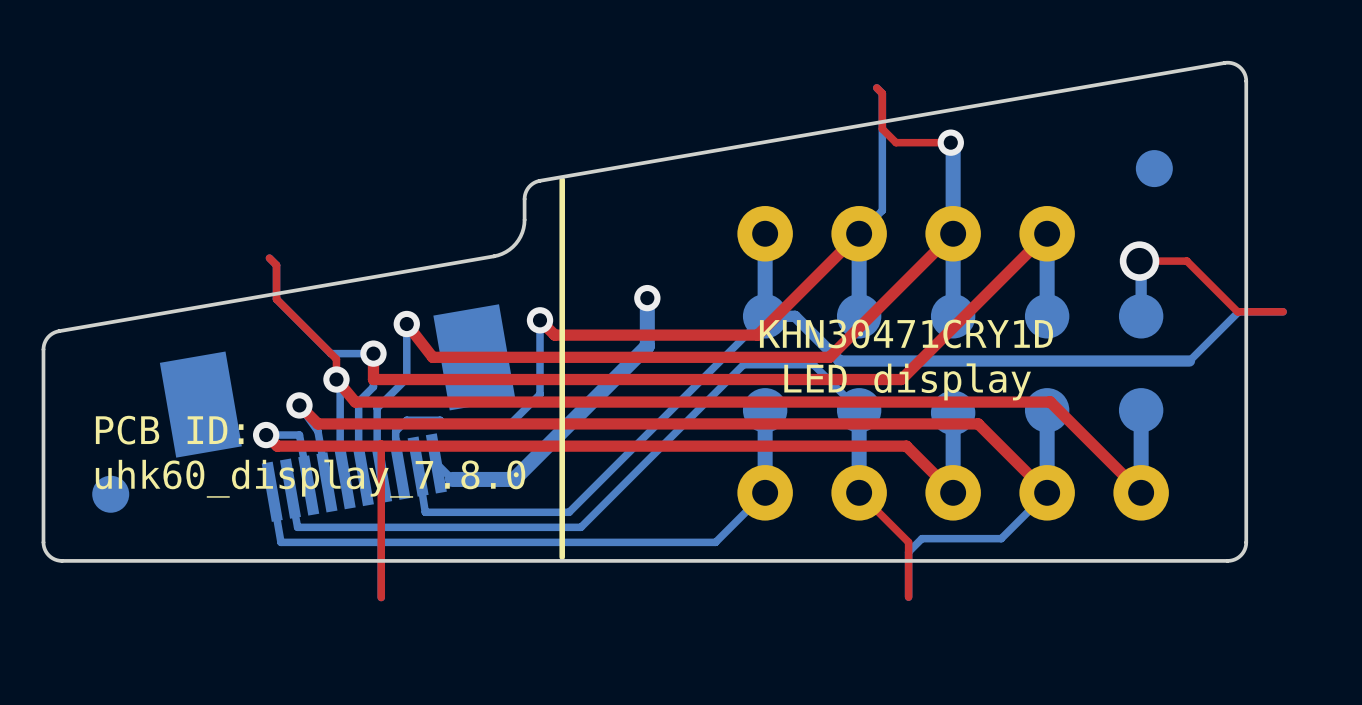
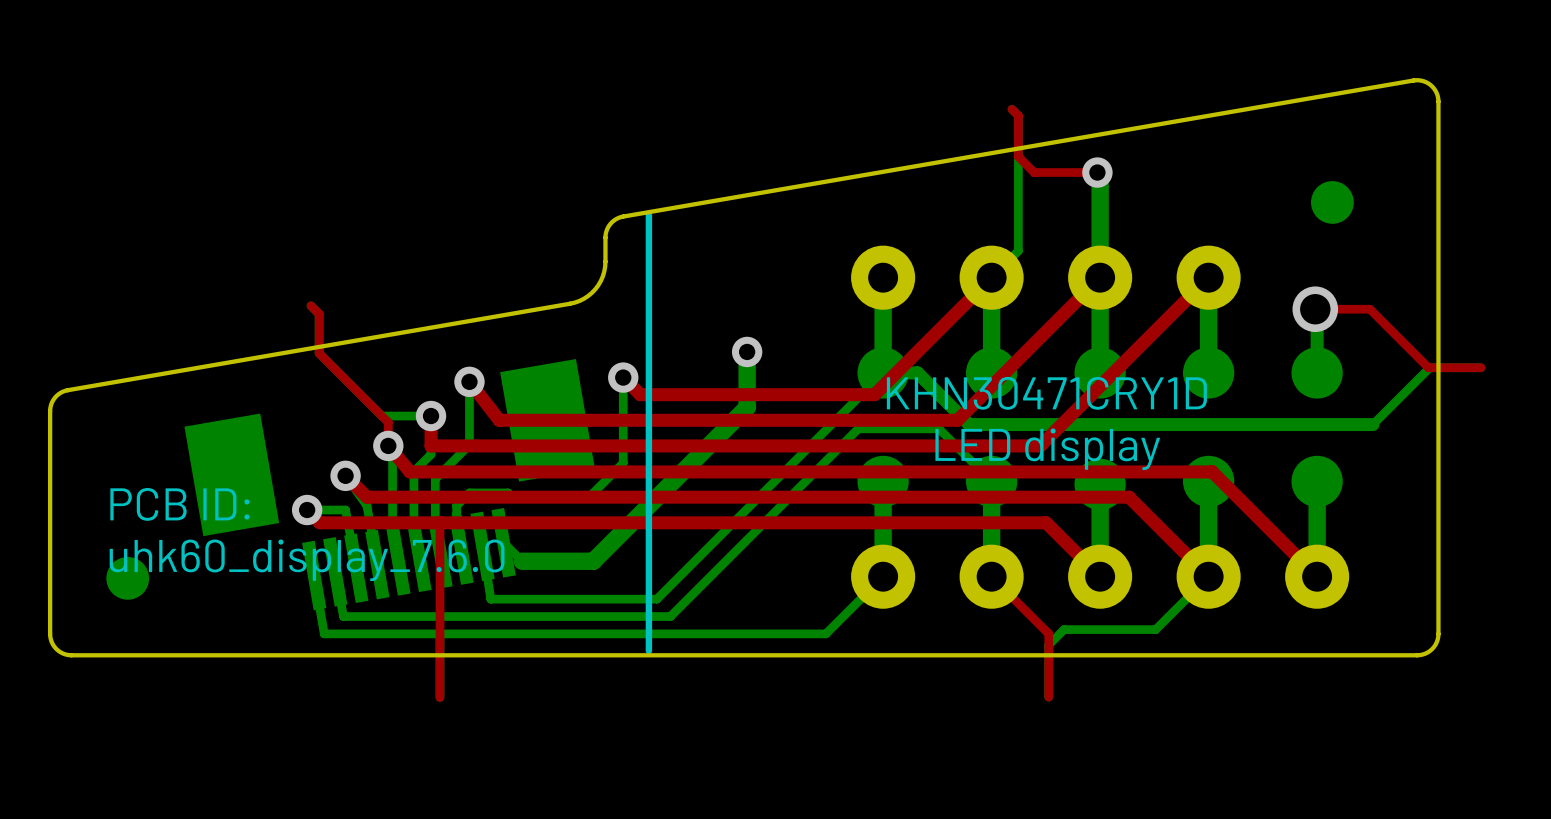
text: uhk60_display_7.8.0 (310, 478) -> uhk60_display_7.6.0 (307, 560)

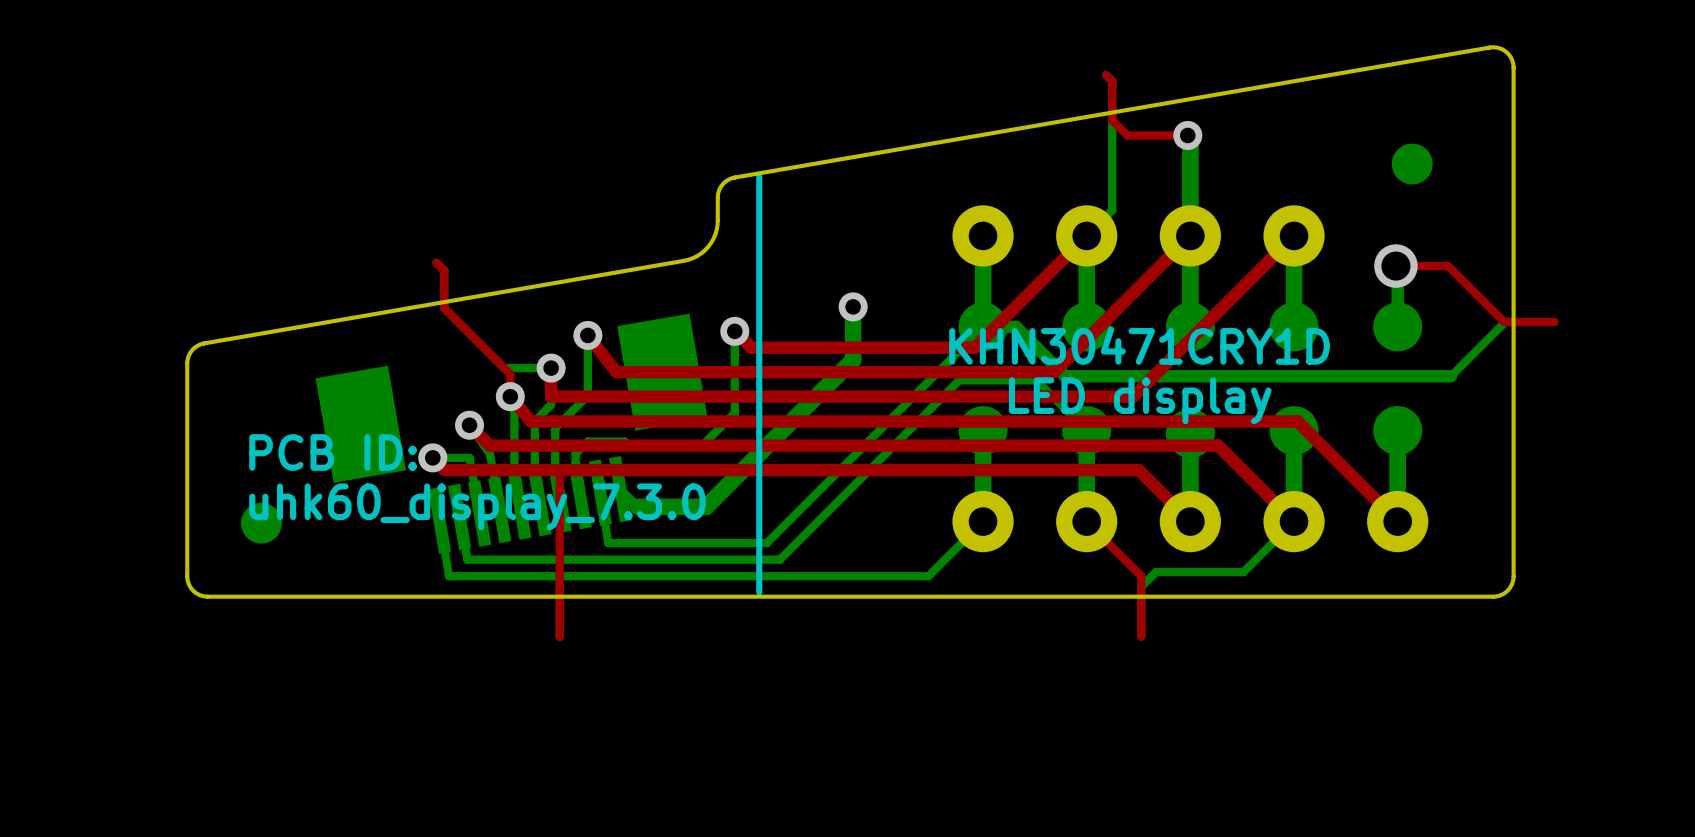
text: uhk60_display_7.6.0 (307, 560) -> uhk60_display_7.3.0 (477, 506)

